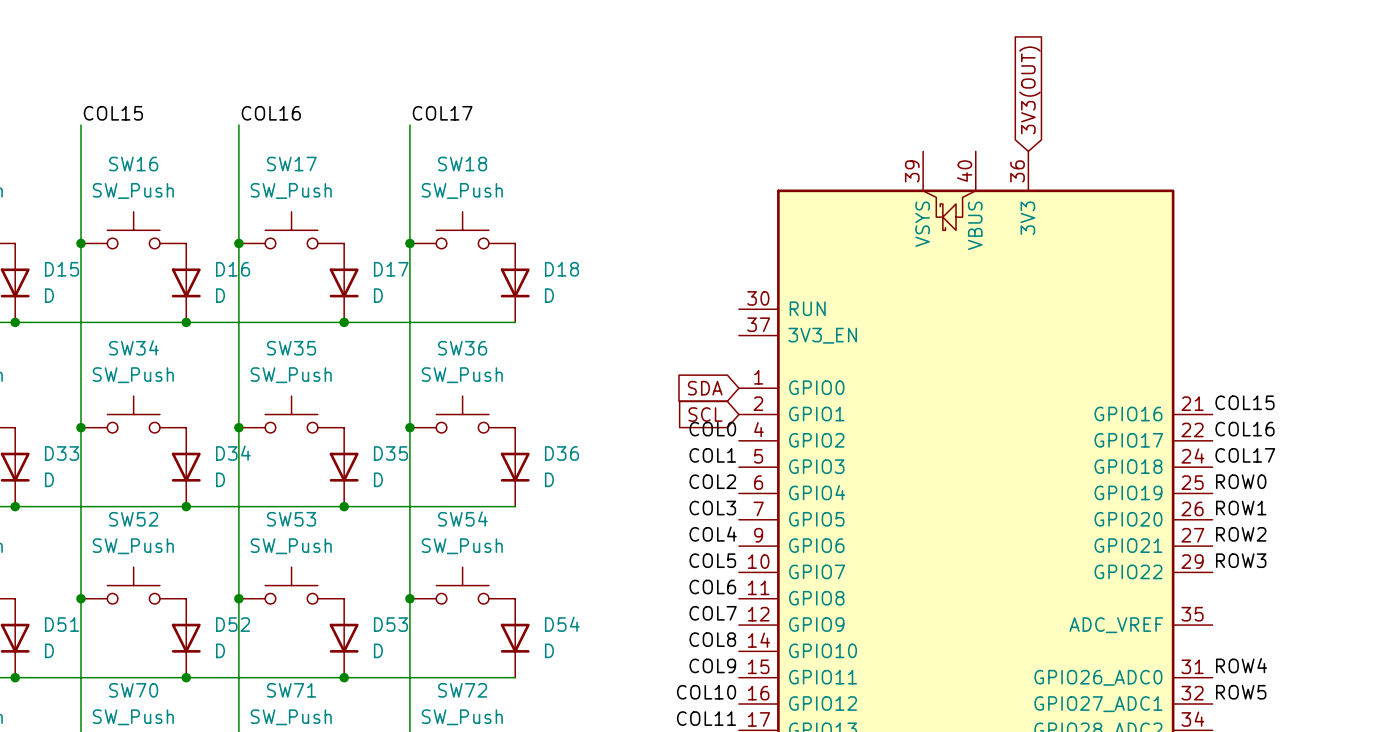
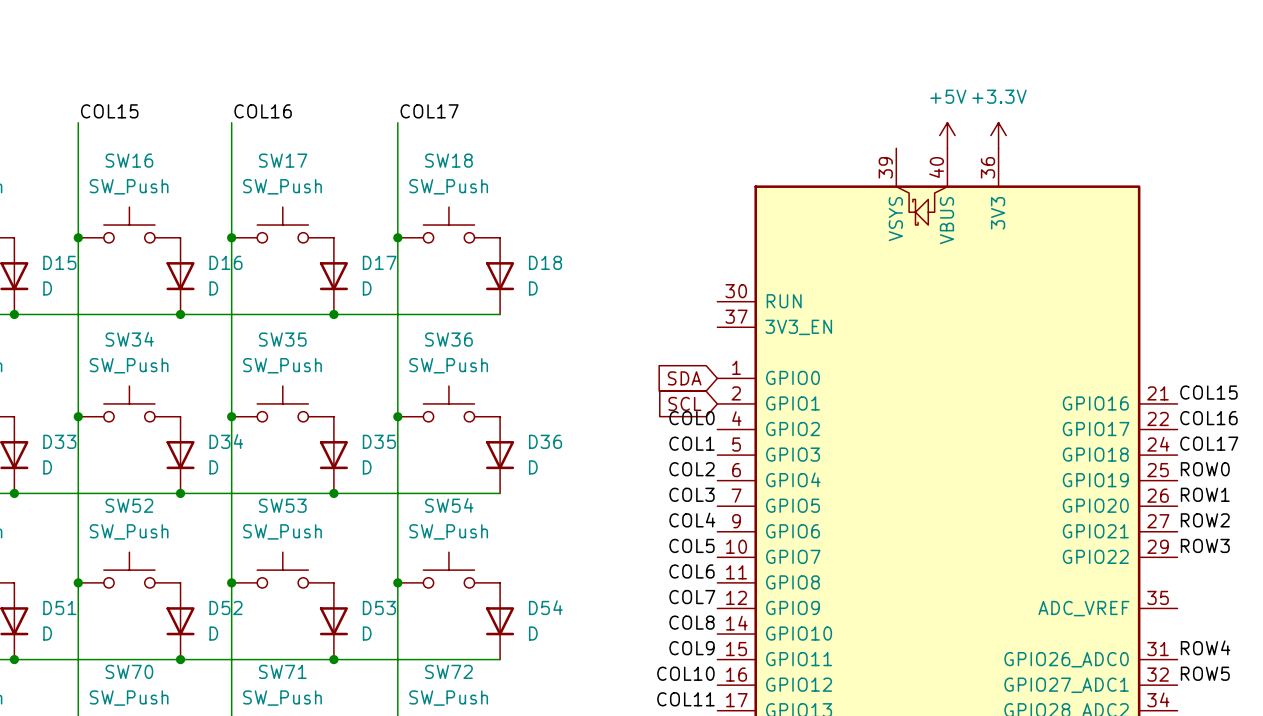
global label: 3V3(OUT) (1029, 90) -> none
power symbol: none -> +5V (947, 135)
power symbol: none -> +3.3V (998, 135)

